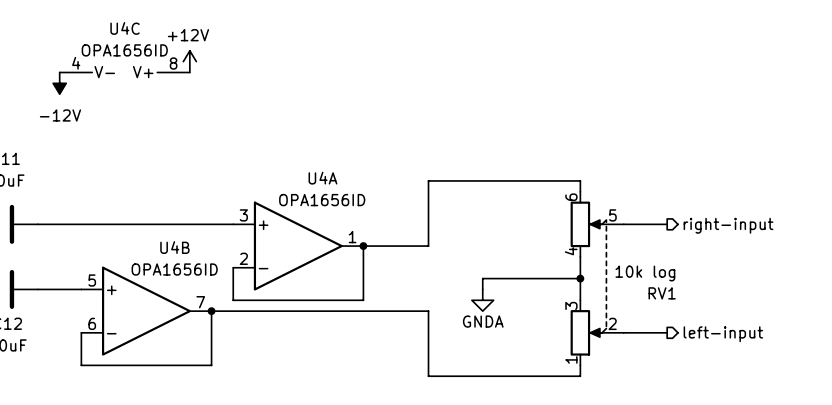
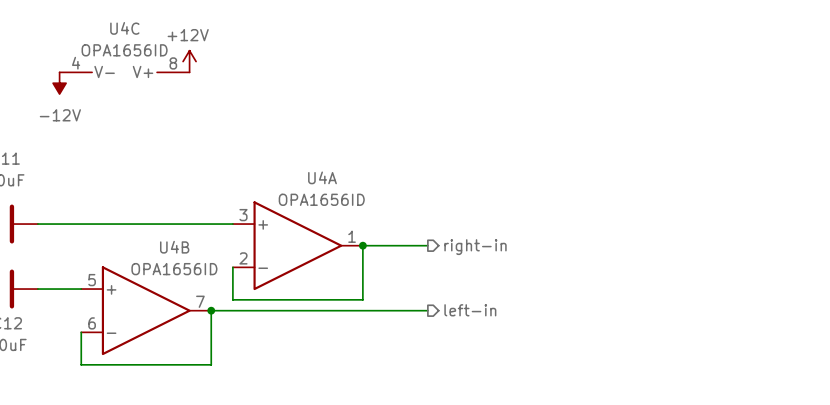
wire: (580, 191) (580, 180) (428, 180) (428, 246) -> none
wire: (623, 224) (667, 224) -> none
hierarchical label: right-input (728, 225) -> none
hierarchical label: none -> right-in (475, 247)
wire: (580, 256) (580, 300) -> none
wire: (580, 278) (482, 278) (482, 289) -> none
junction: (580, 278) -> none
RV1: 10k log (597, 278) -> none
power symbol: GNDA (482, 300) -> none
hierarchical label: none -> left-in (470, 310)
wire: (428, 311) (428, 376) (580, 376) (580, 365) -> none
wire: (623, 332) (667, 332) -> none
hierarchical label: left-input (723, 334) -> none

